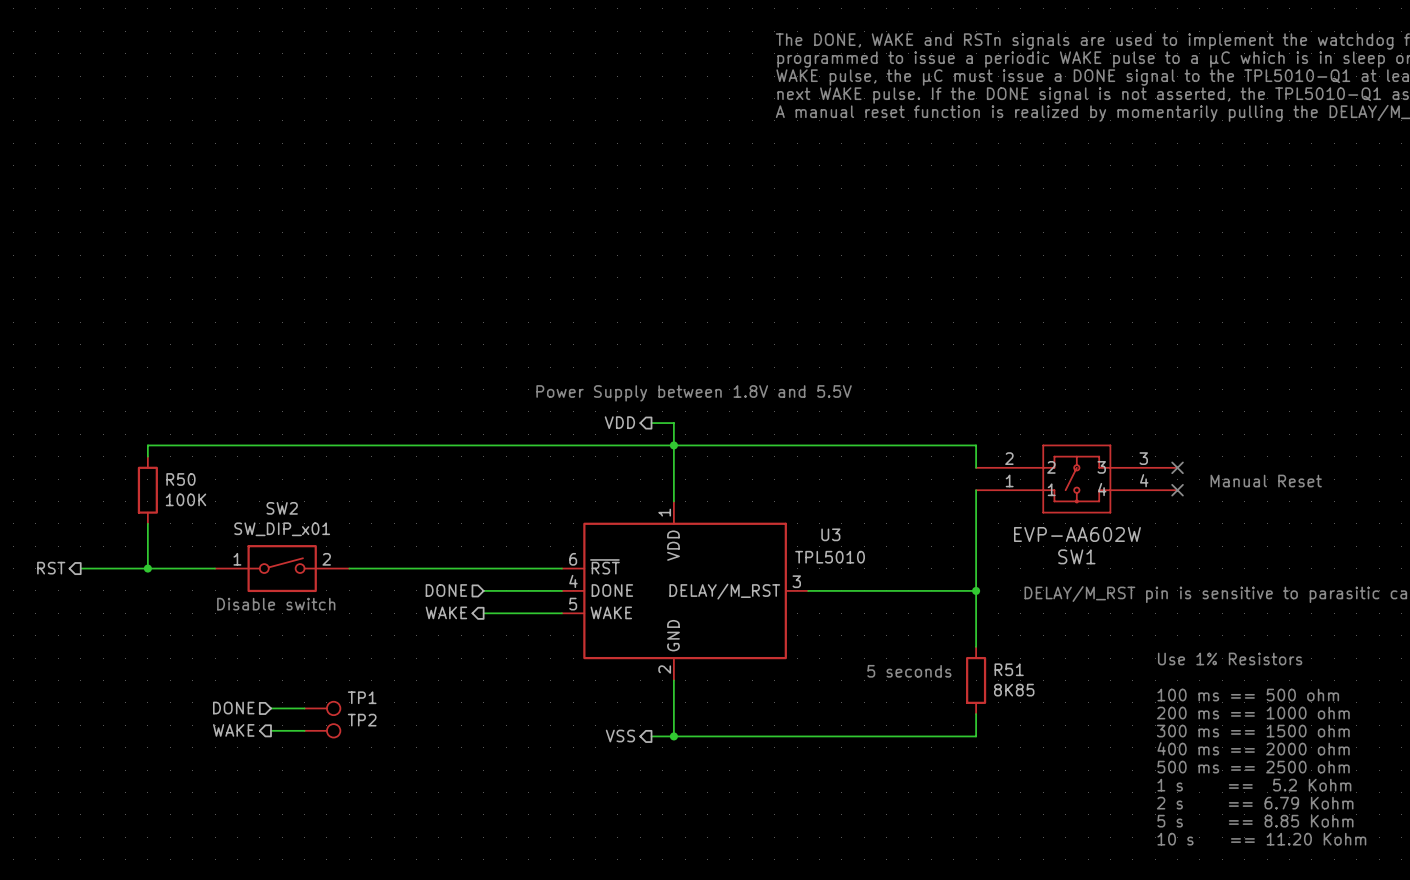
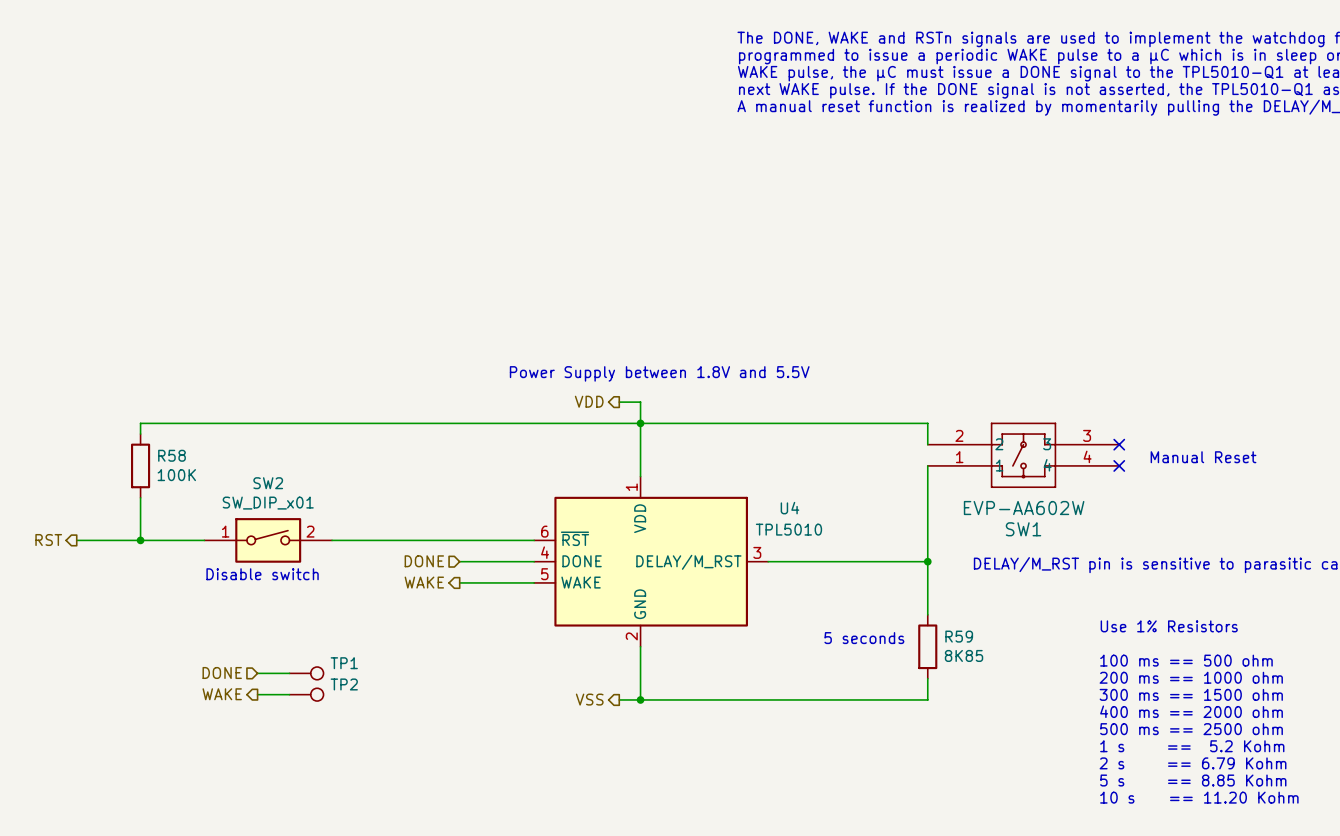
R50 name: R50 (180, 479) -> R58 (172, 455)
U3 name: U3 (830, 534) -> U4 (789, 508)
R51 name: R51 (1009, 669) -> R59 (959, 636)

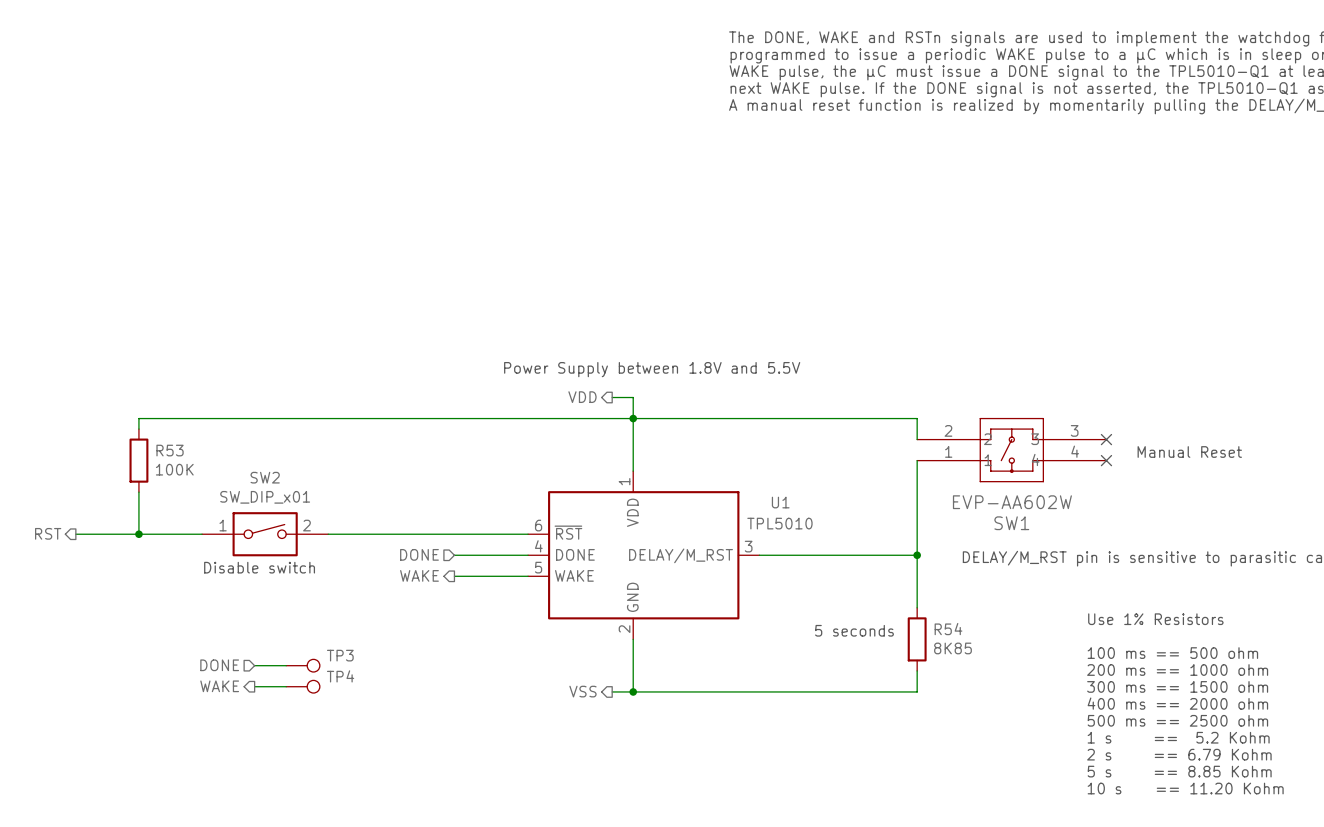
R58 name: R58 (172, 455) -> R53 (170, 450)
U4 name: U4 (789, 508) -> U1 (780, 502)
R59 name: R59 (959, 636) -> R54 (948, 629)
TP1 name: TP1 (344, 663) -> TP3 (340, 655)
TP2 name: TP2 (344, 684) -> TP4 (340, 676)

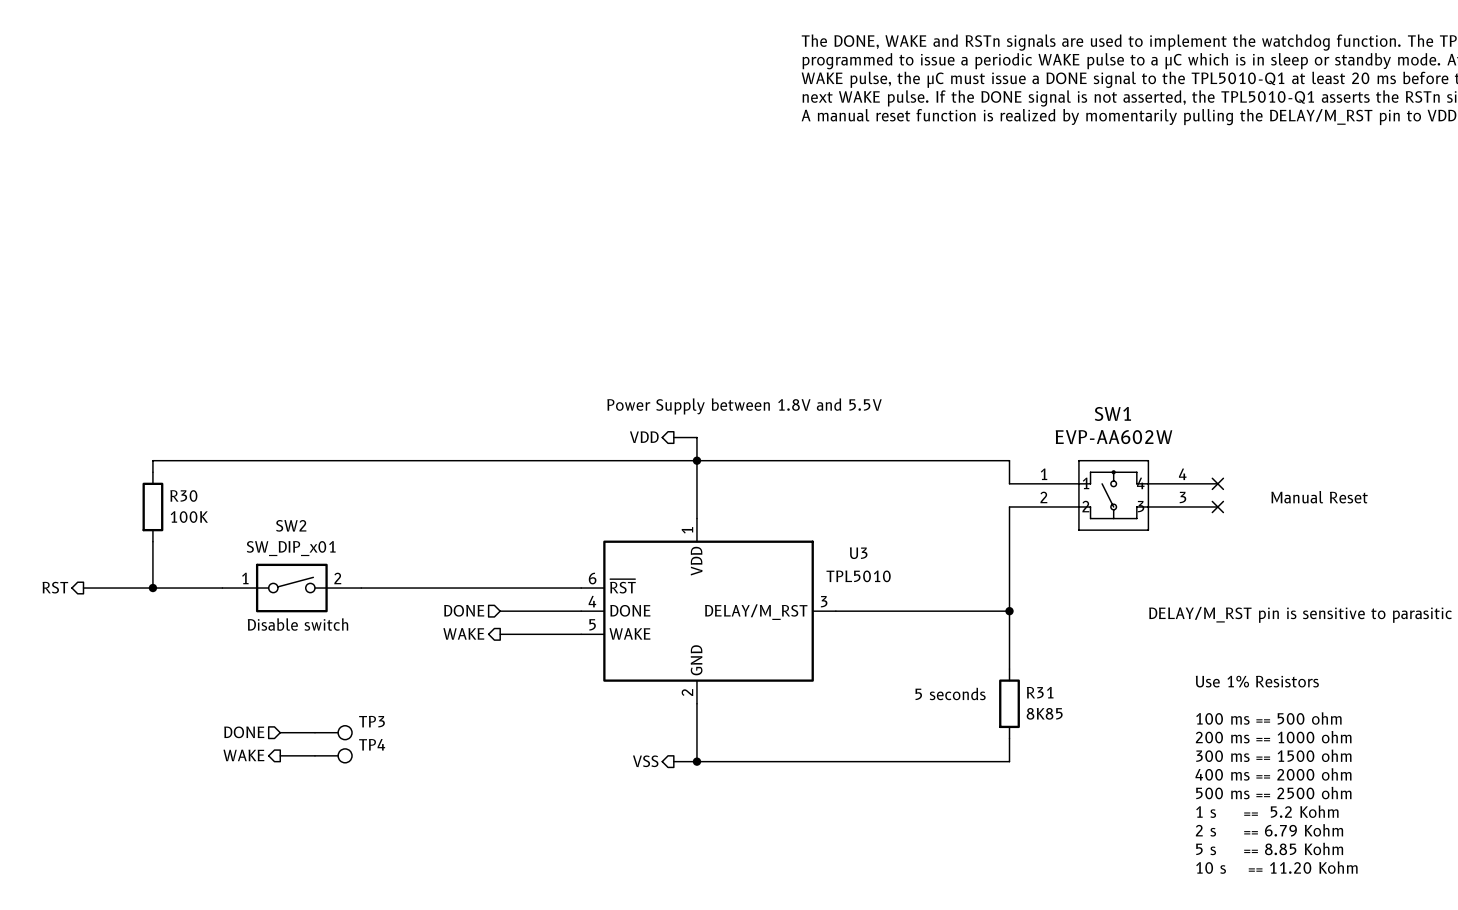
R53 name: R53 (170, 450) -> R30 (183, 495)
SW1 flip: as is (1011, 450) -> up-down (1113, 495)
U1 name: U1 (780, 502) -> U3 (858, 553)
R54 name: R54 (948, 629) -> R31 (1040, 692)

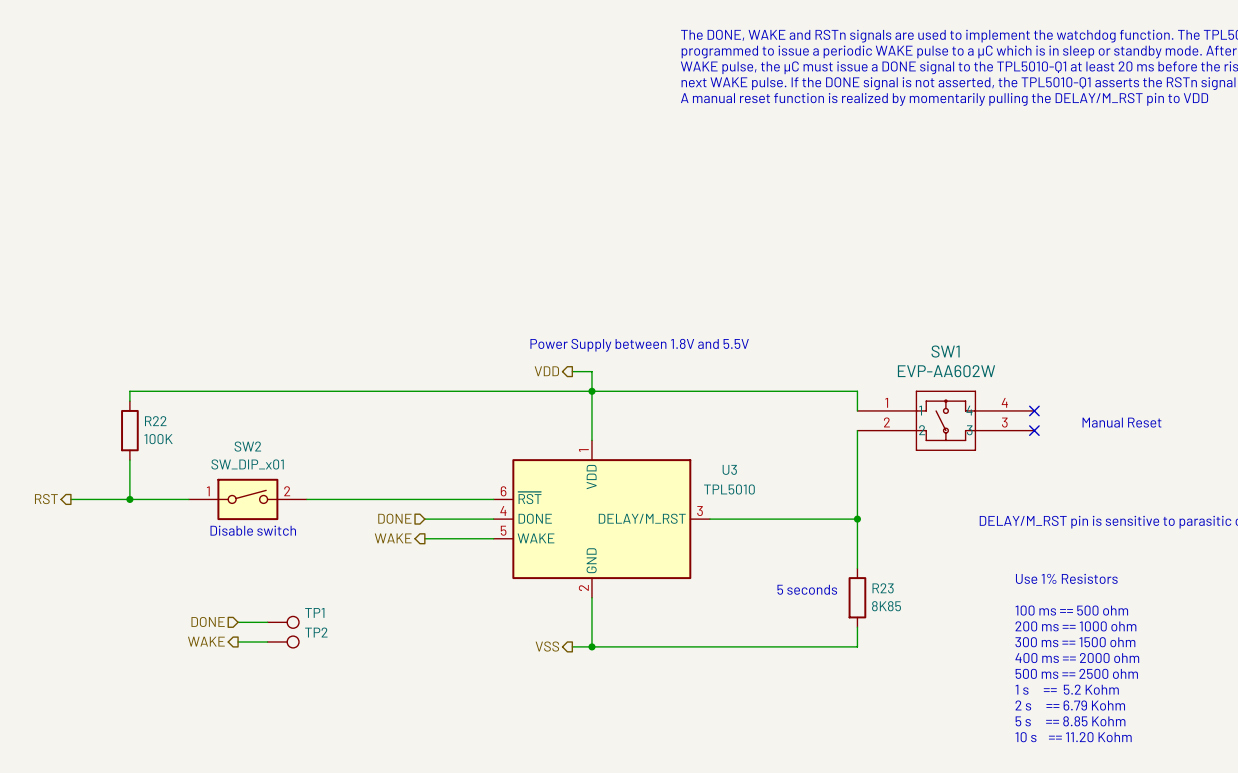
R30 name: R30 (183, 495) -> R22 (155, 421)
R31 name: R31 (1040, 692) -> R23 (883, 588)
TP3 name: TP3 (371, 721) -> TP1 (314, 612)
TP4 name: TP4 (372, 744) -> TP2 (316, 632)

